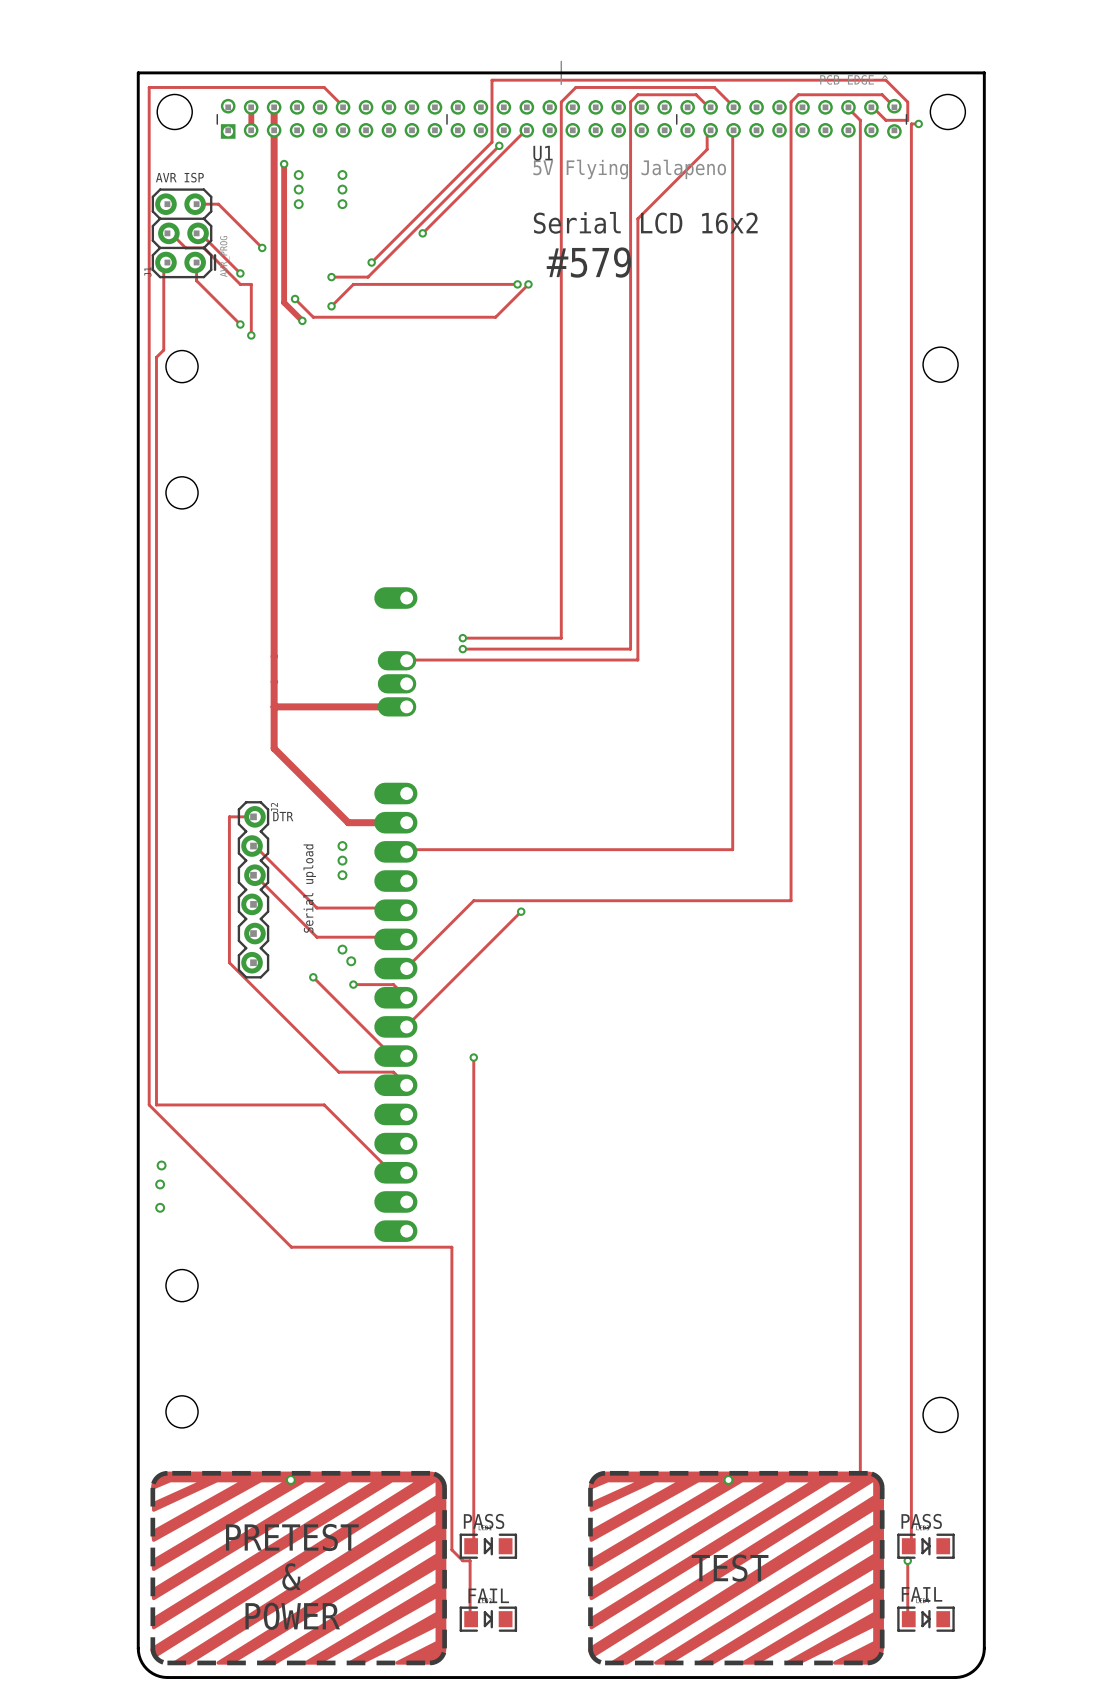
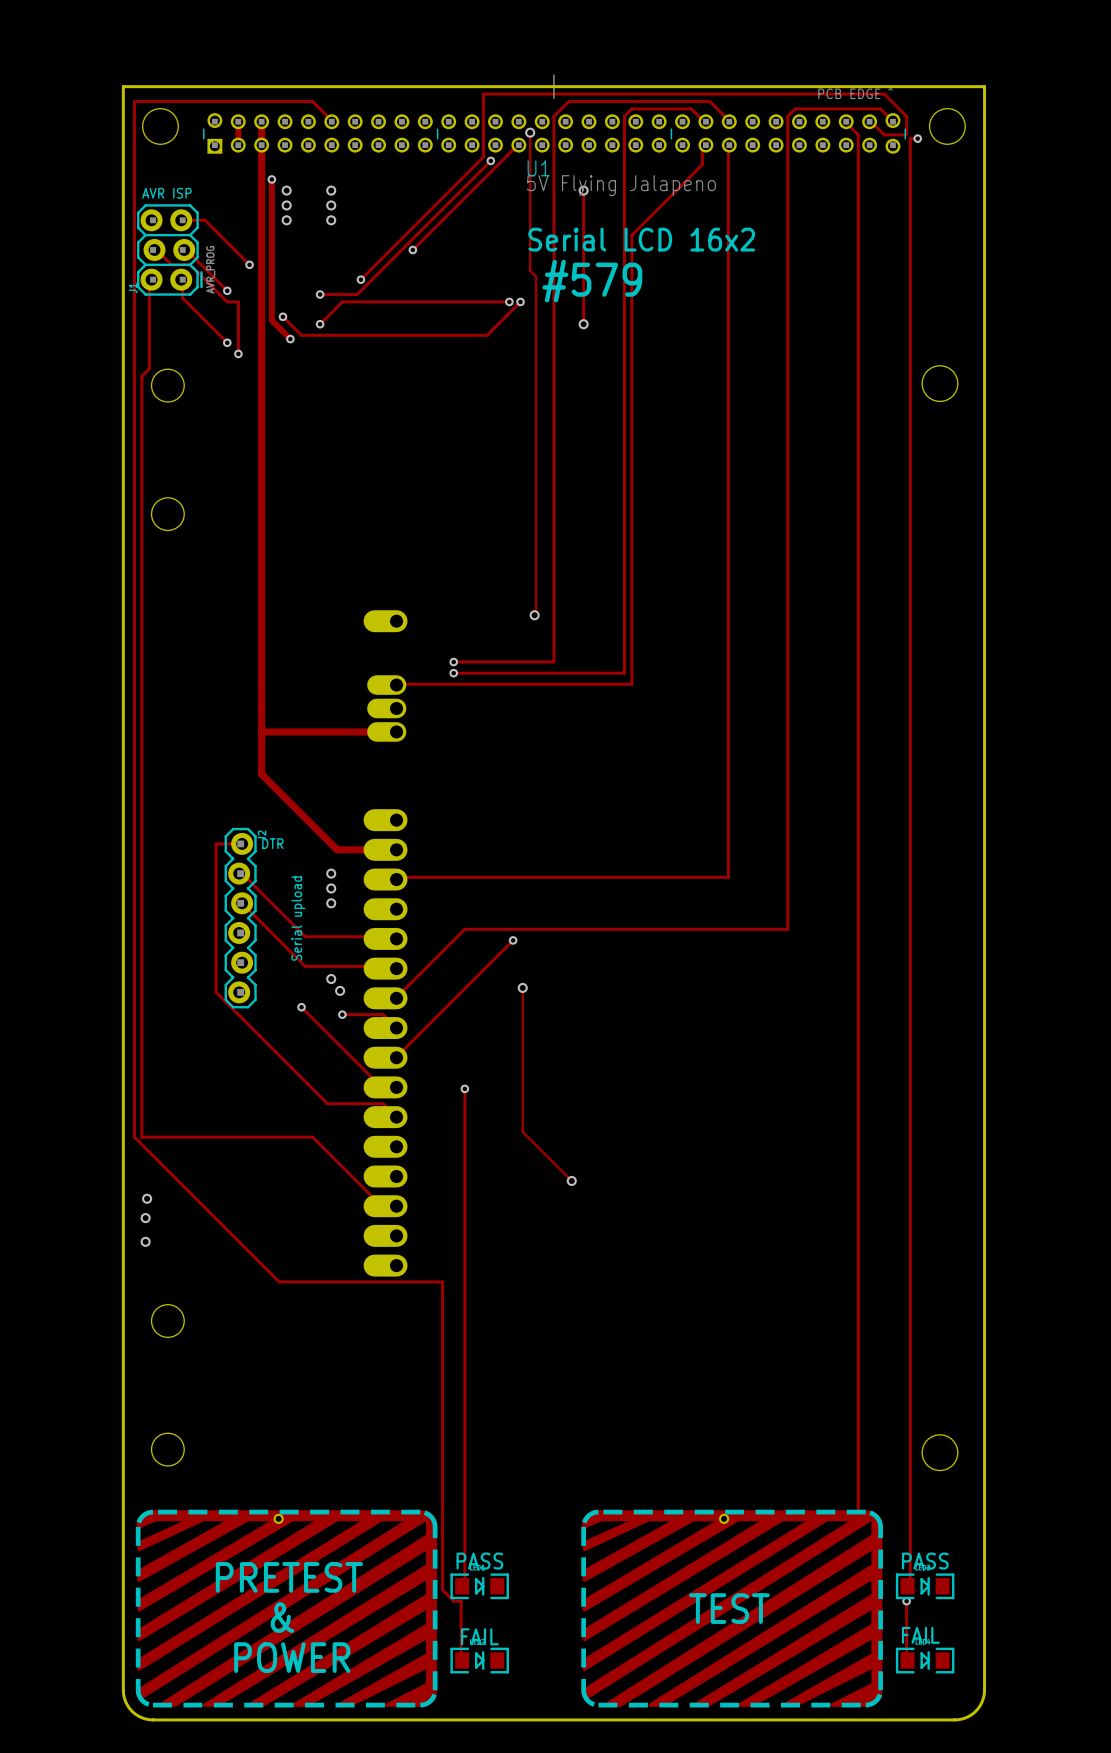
track: none -> (530, 132) (530, 270) (536, 276) (534, 615)
via: none -> (530, 132)
track: none -> (583, 190) (583, 324)
via: none -> (583, 190)
via: none -> (583, 324)
via: none -> (534, 615)
track: none -> (522, 987) (522, 1131) (571, 1180)
via: none -> (522, 987)
via: none -> (571, 1180)

